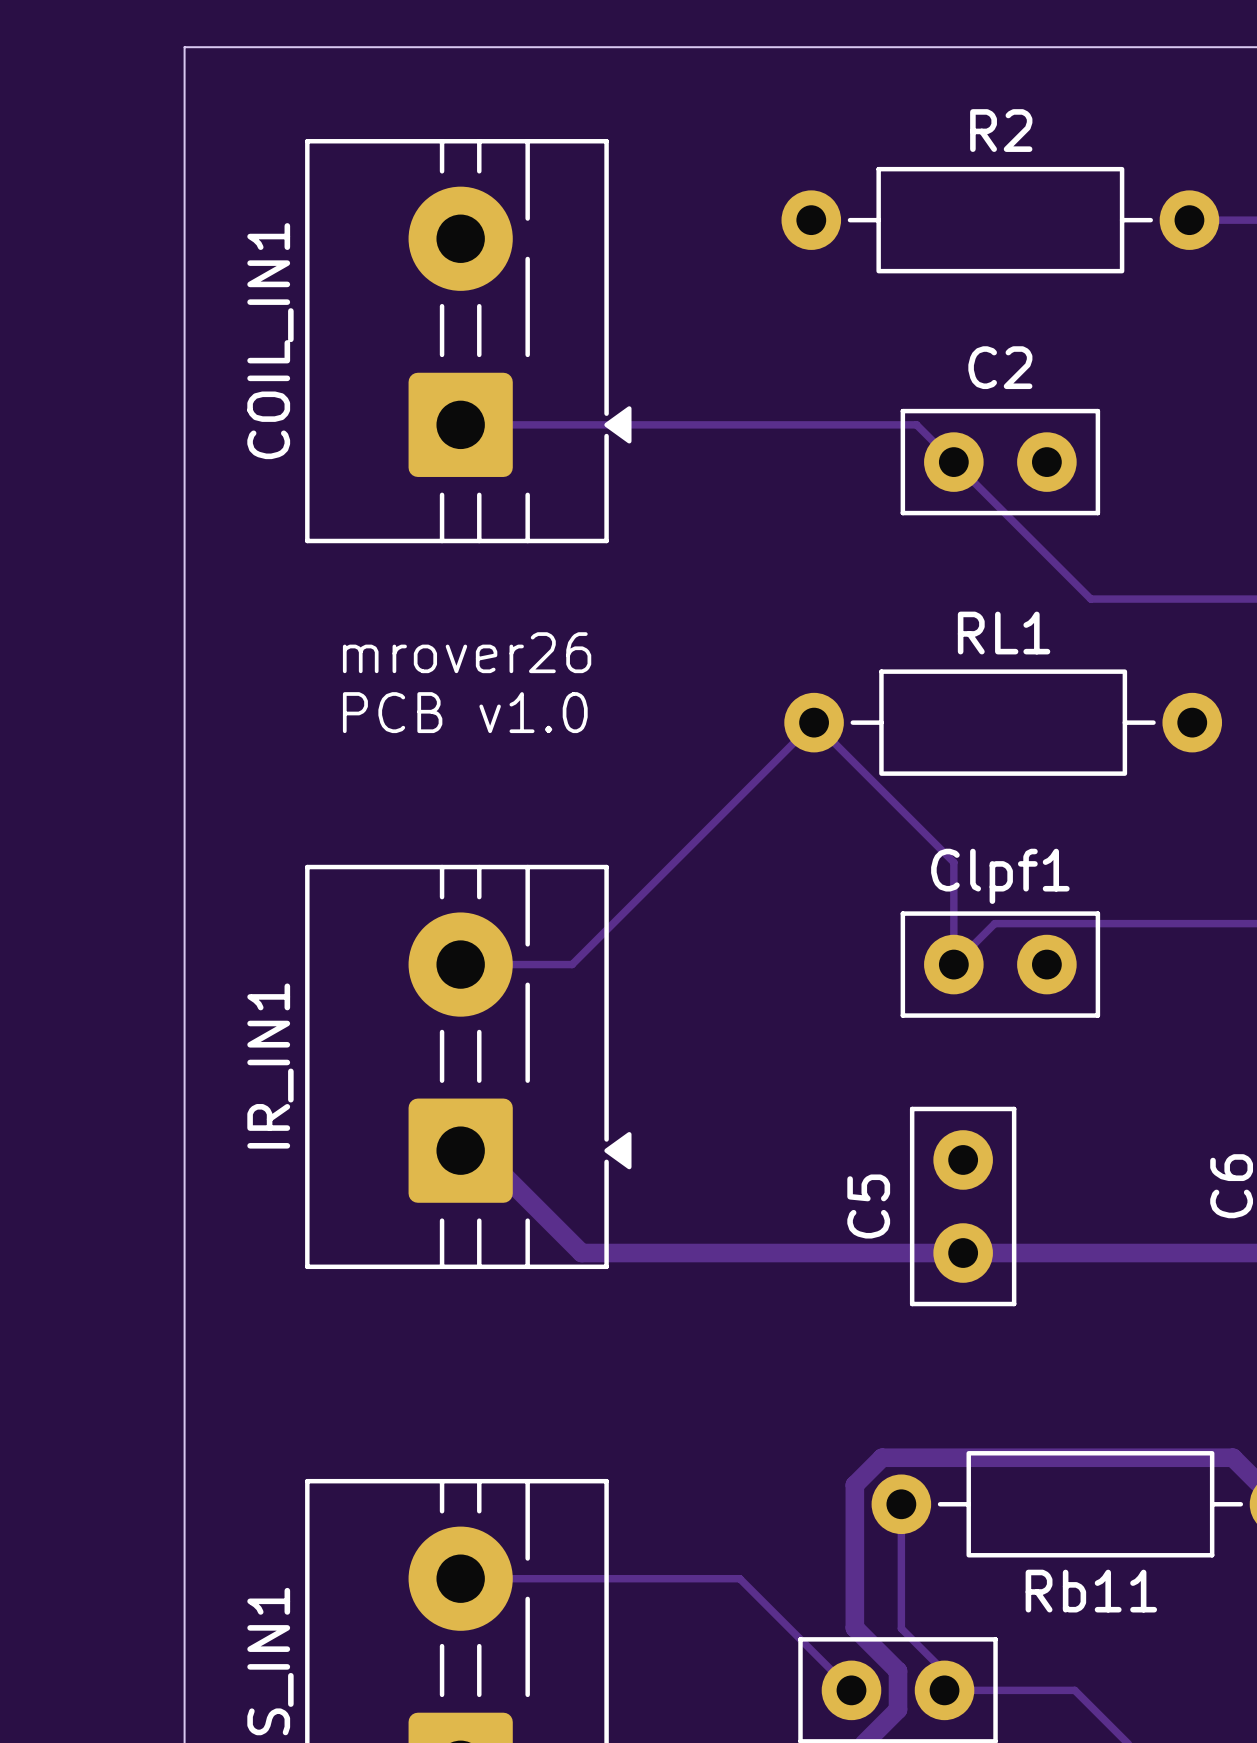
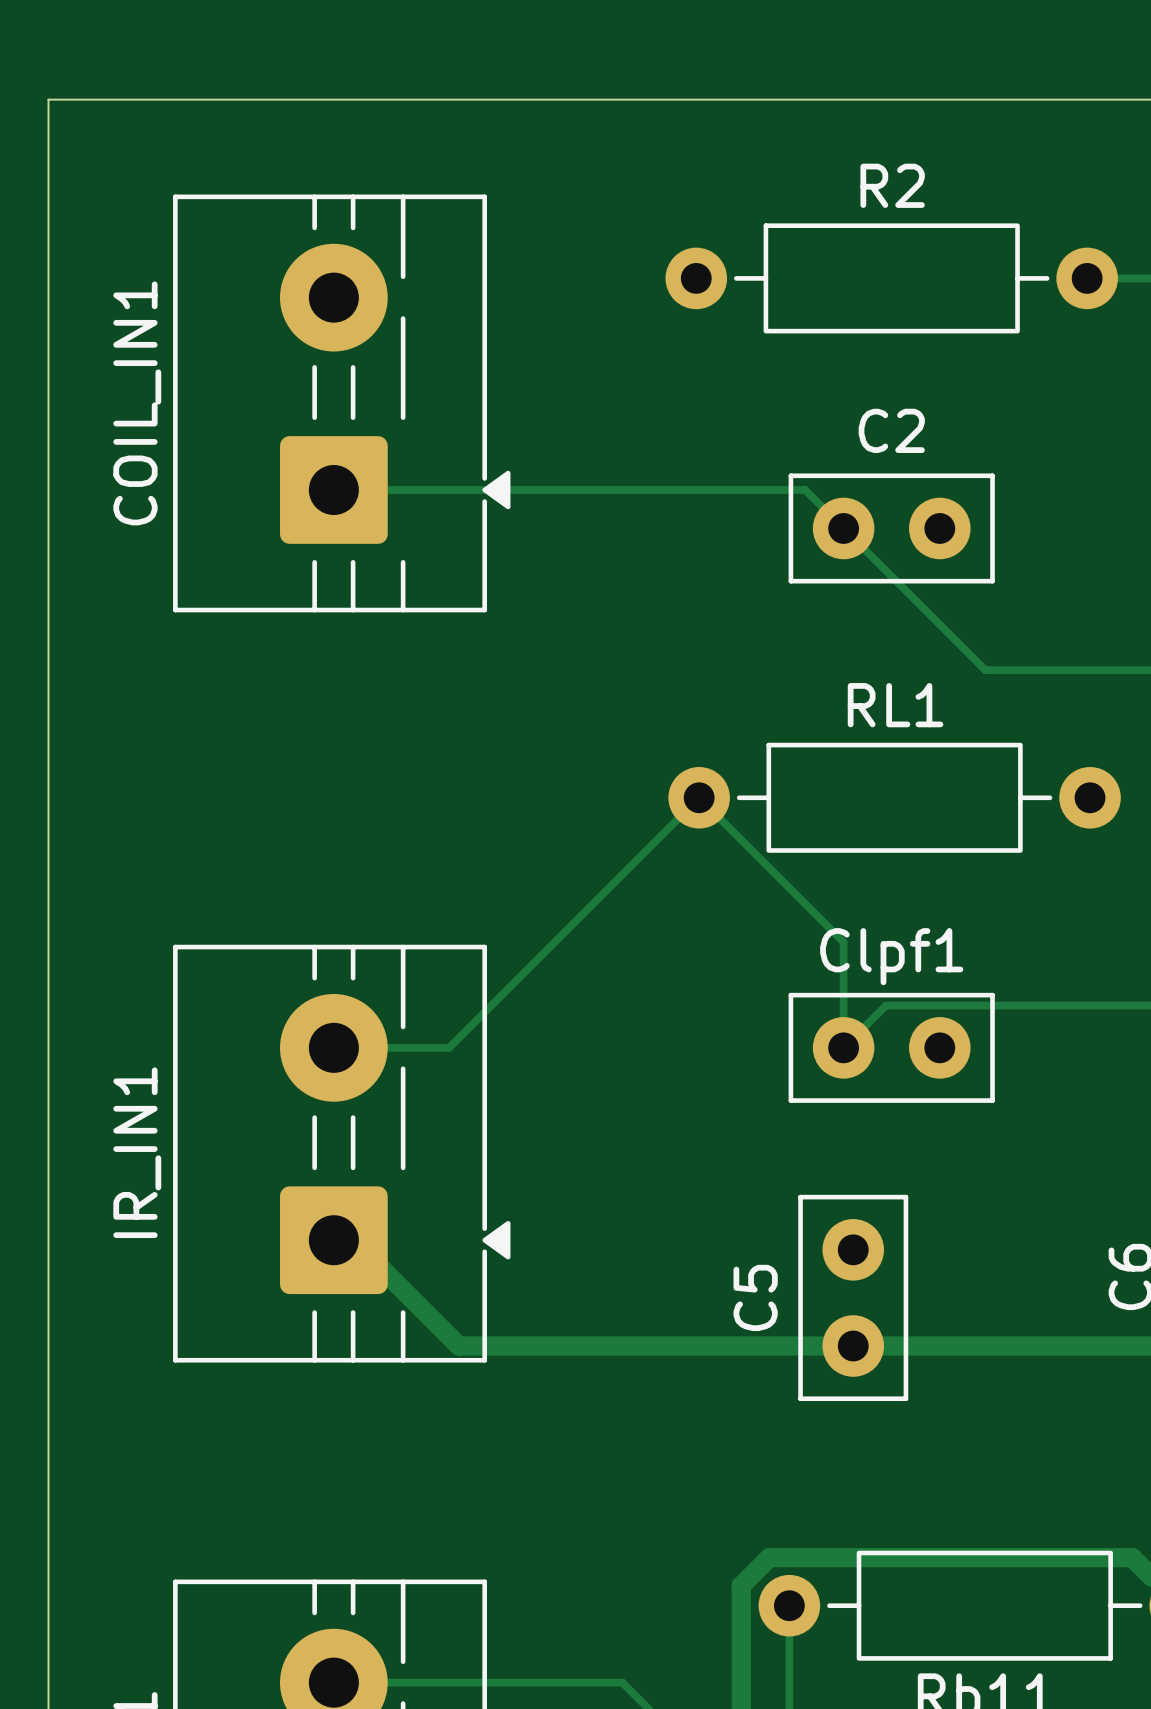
text: mrover26 (467, 652) -> none
text: PCB v1.0 (465, 712) -> none

